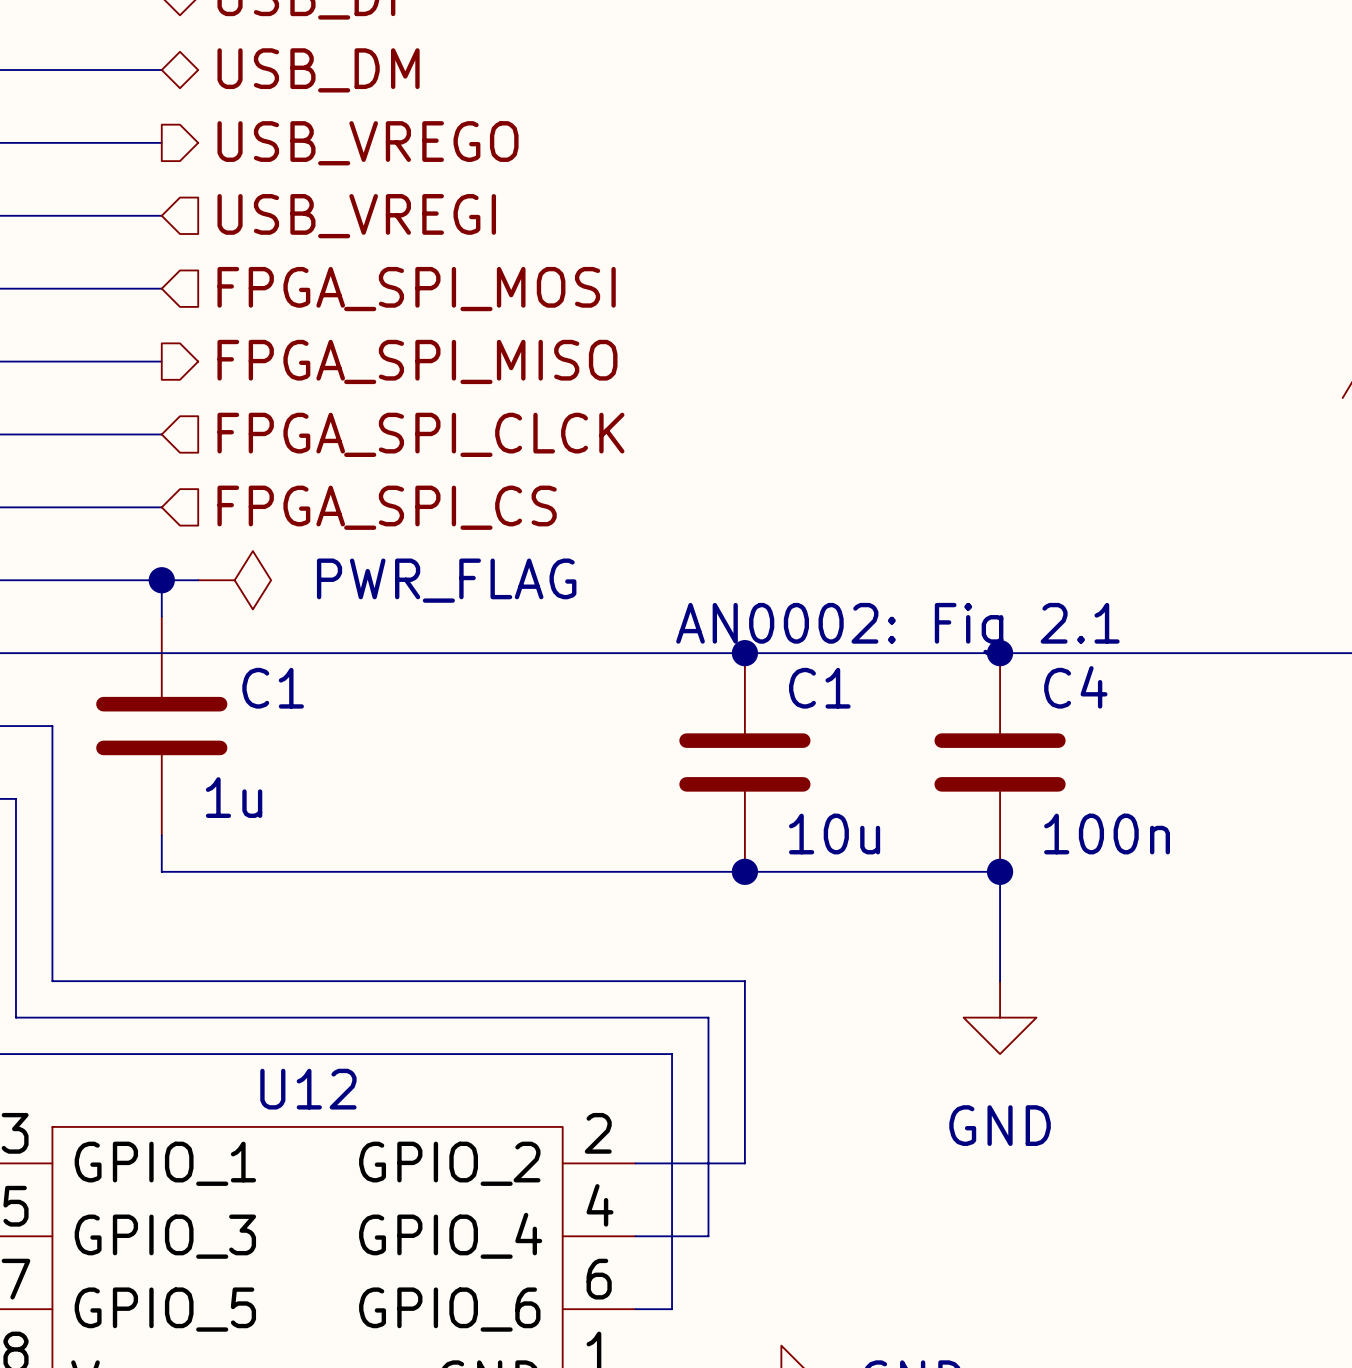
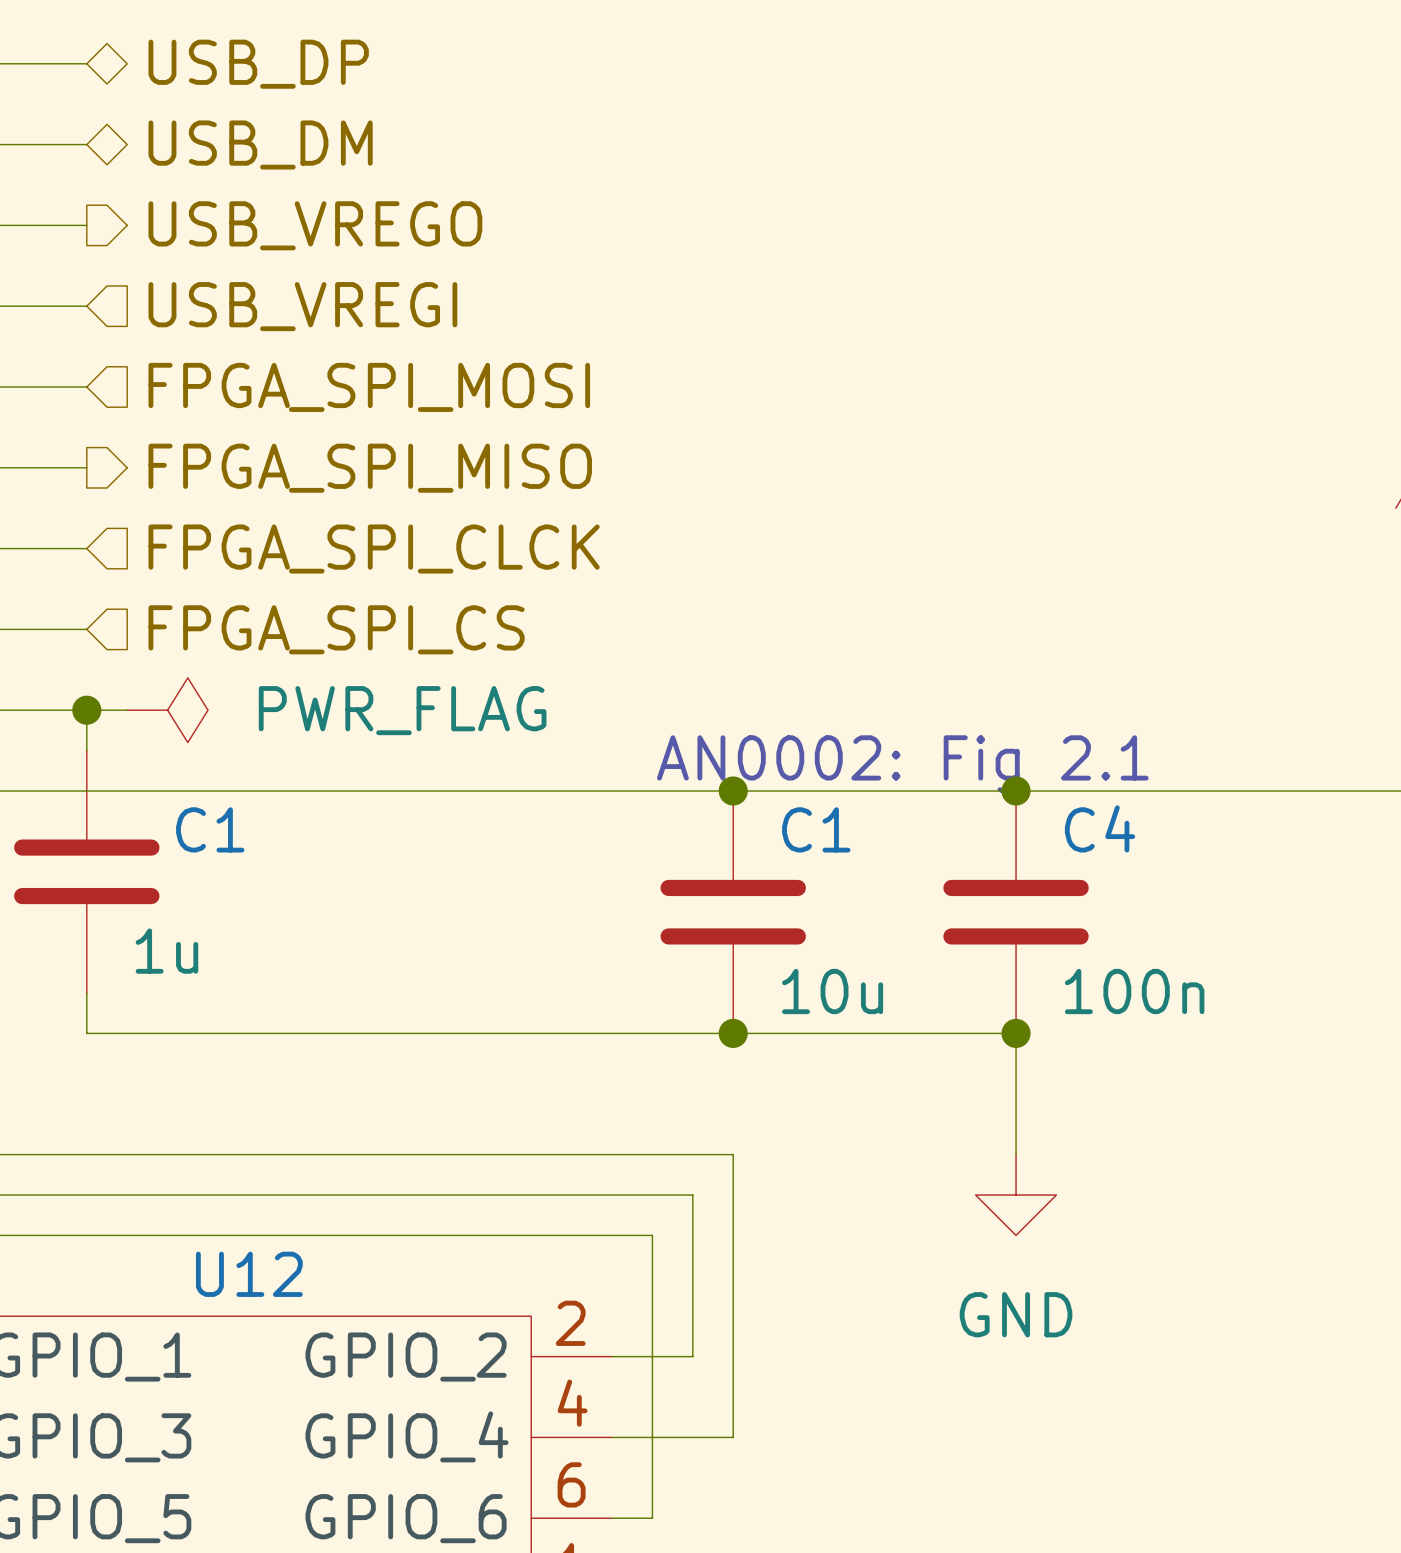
wire: (744, 1163) (708, 1163) (708, 1236) -> (733, 1356) (733, 1437) (692, 1437)

